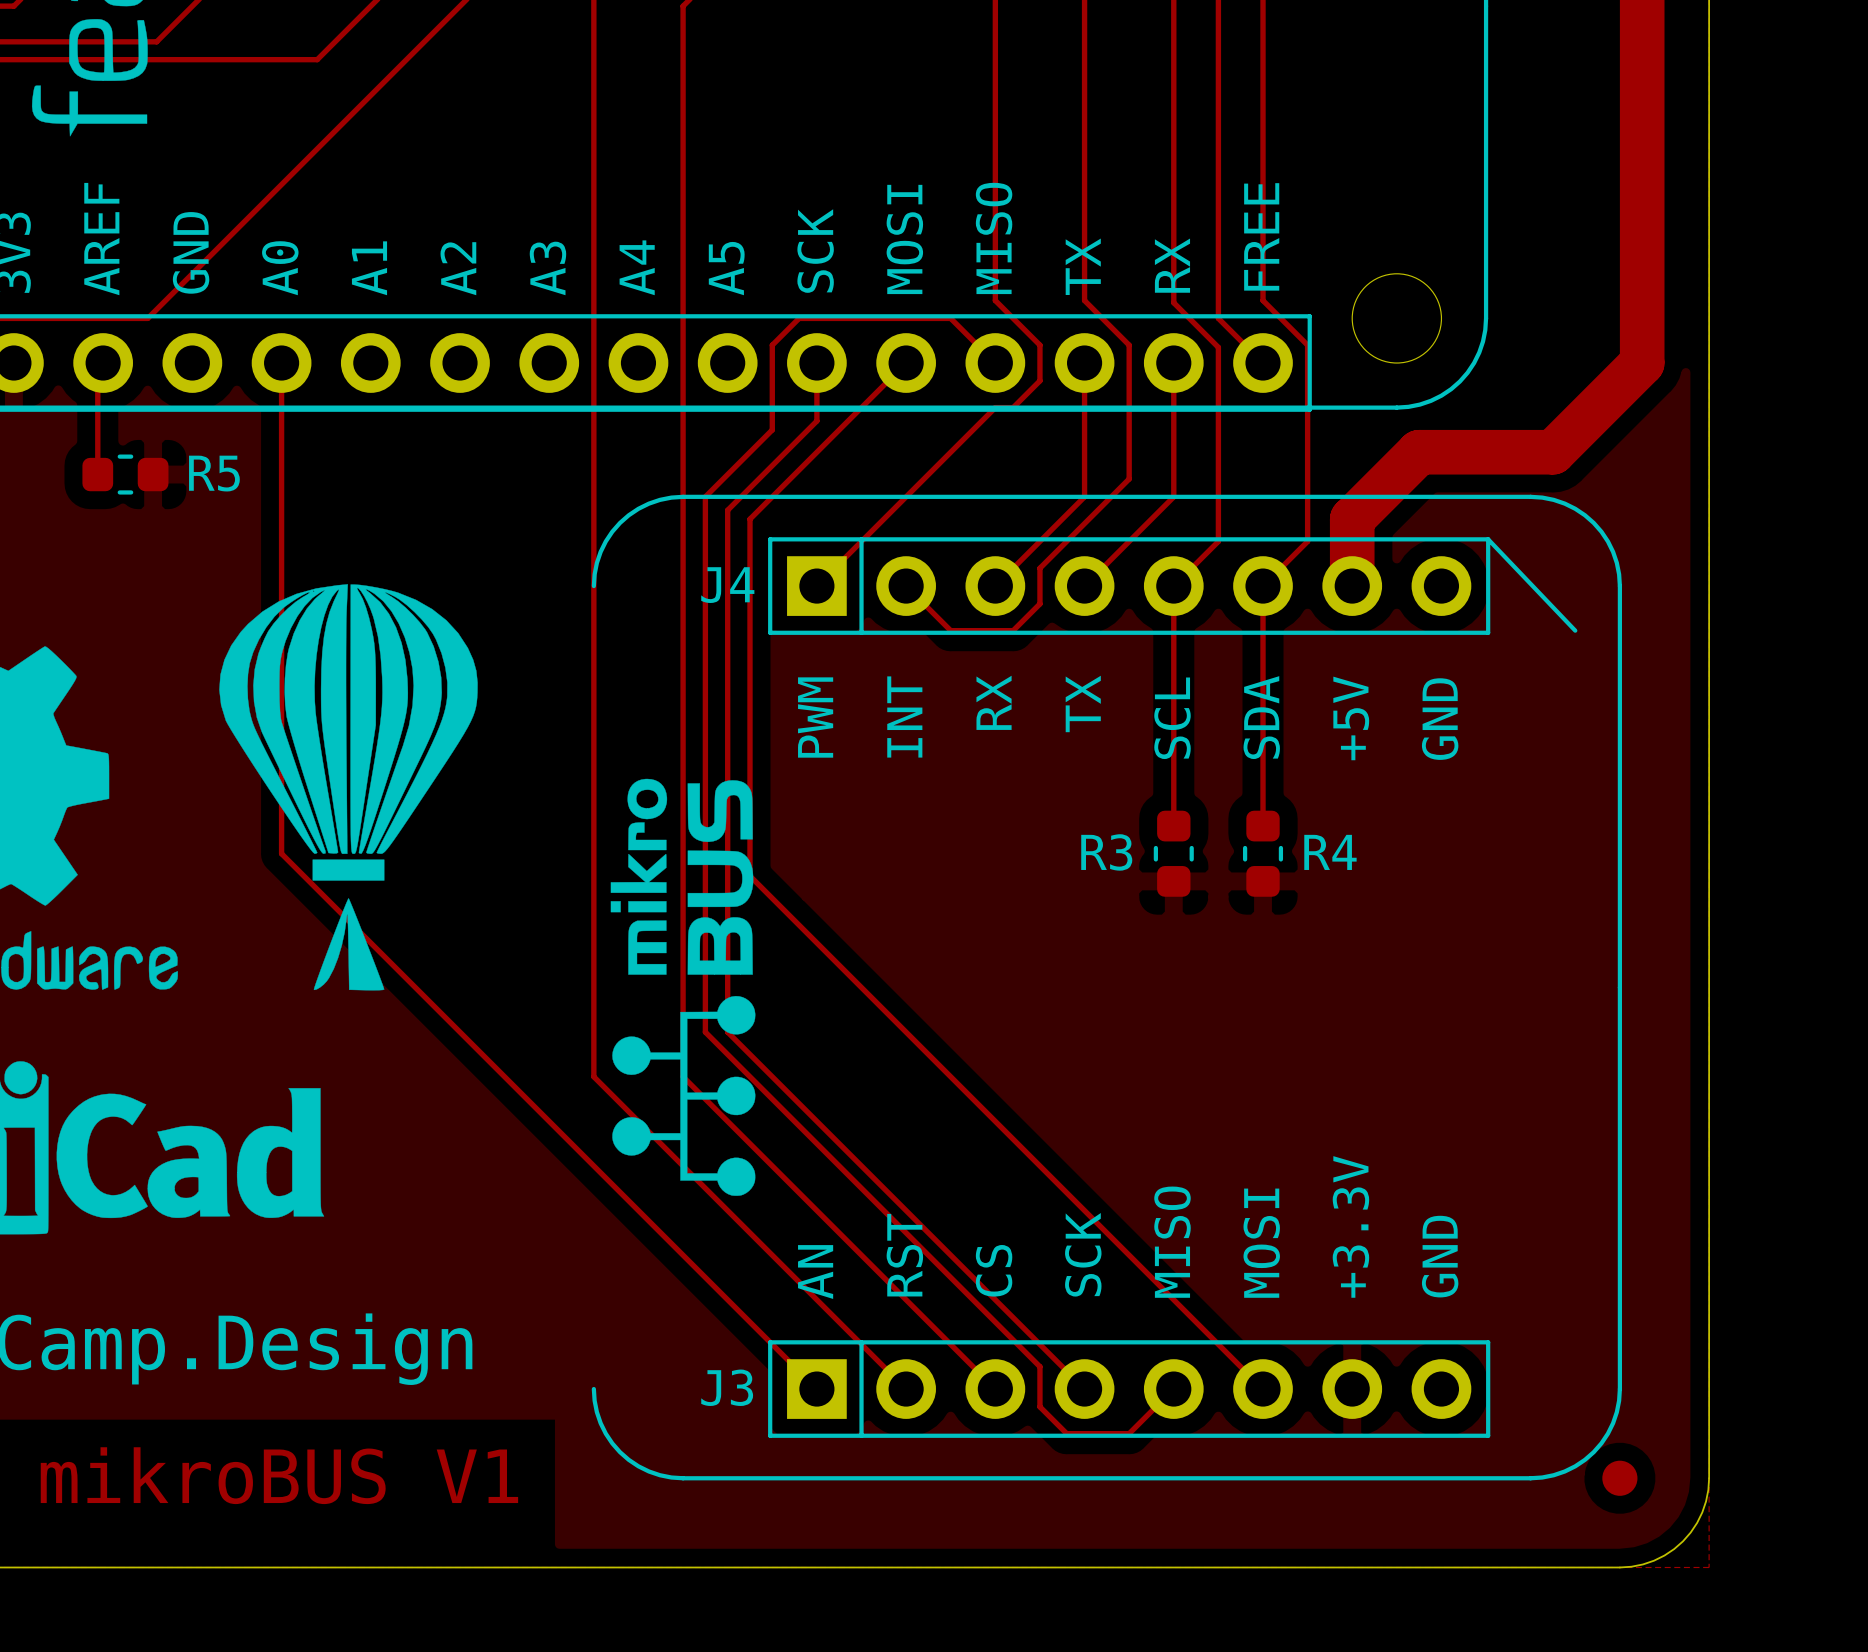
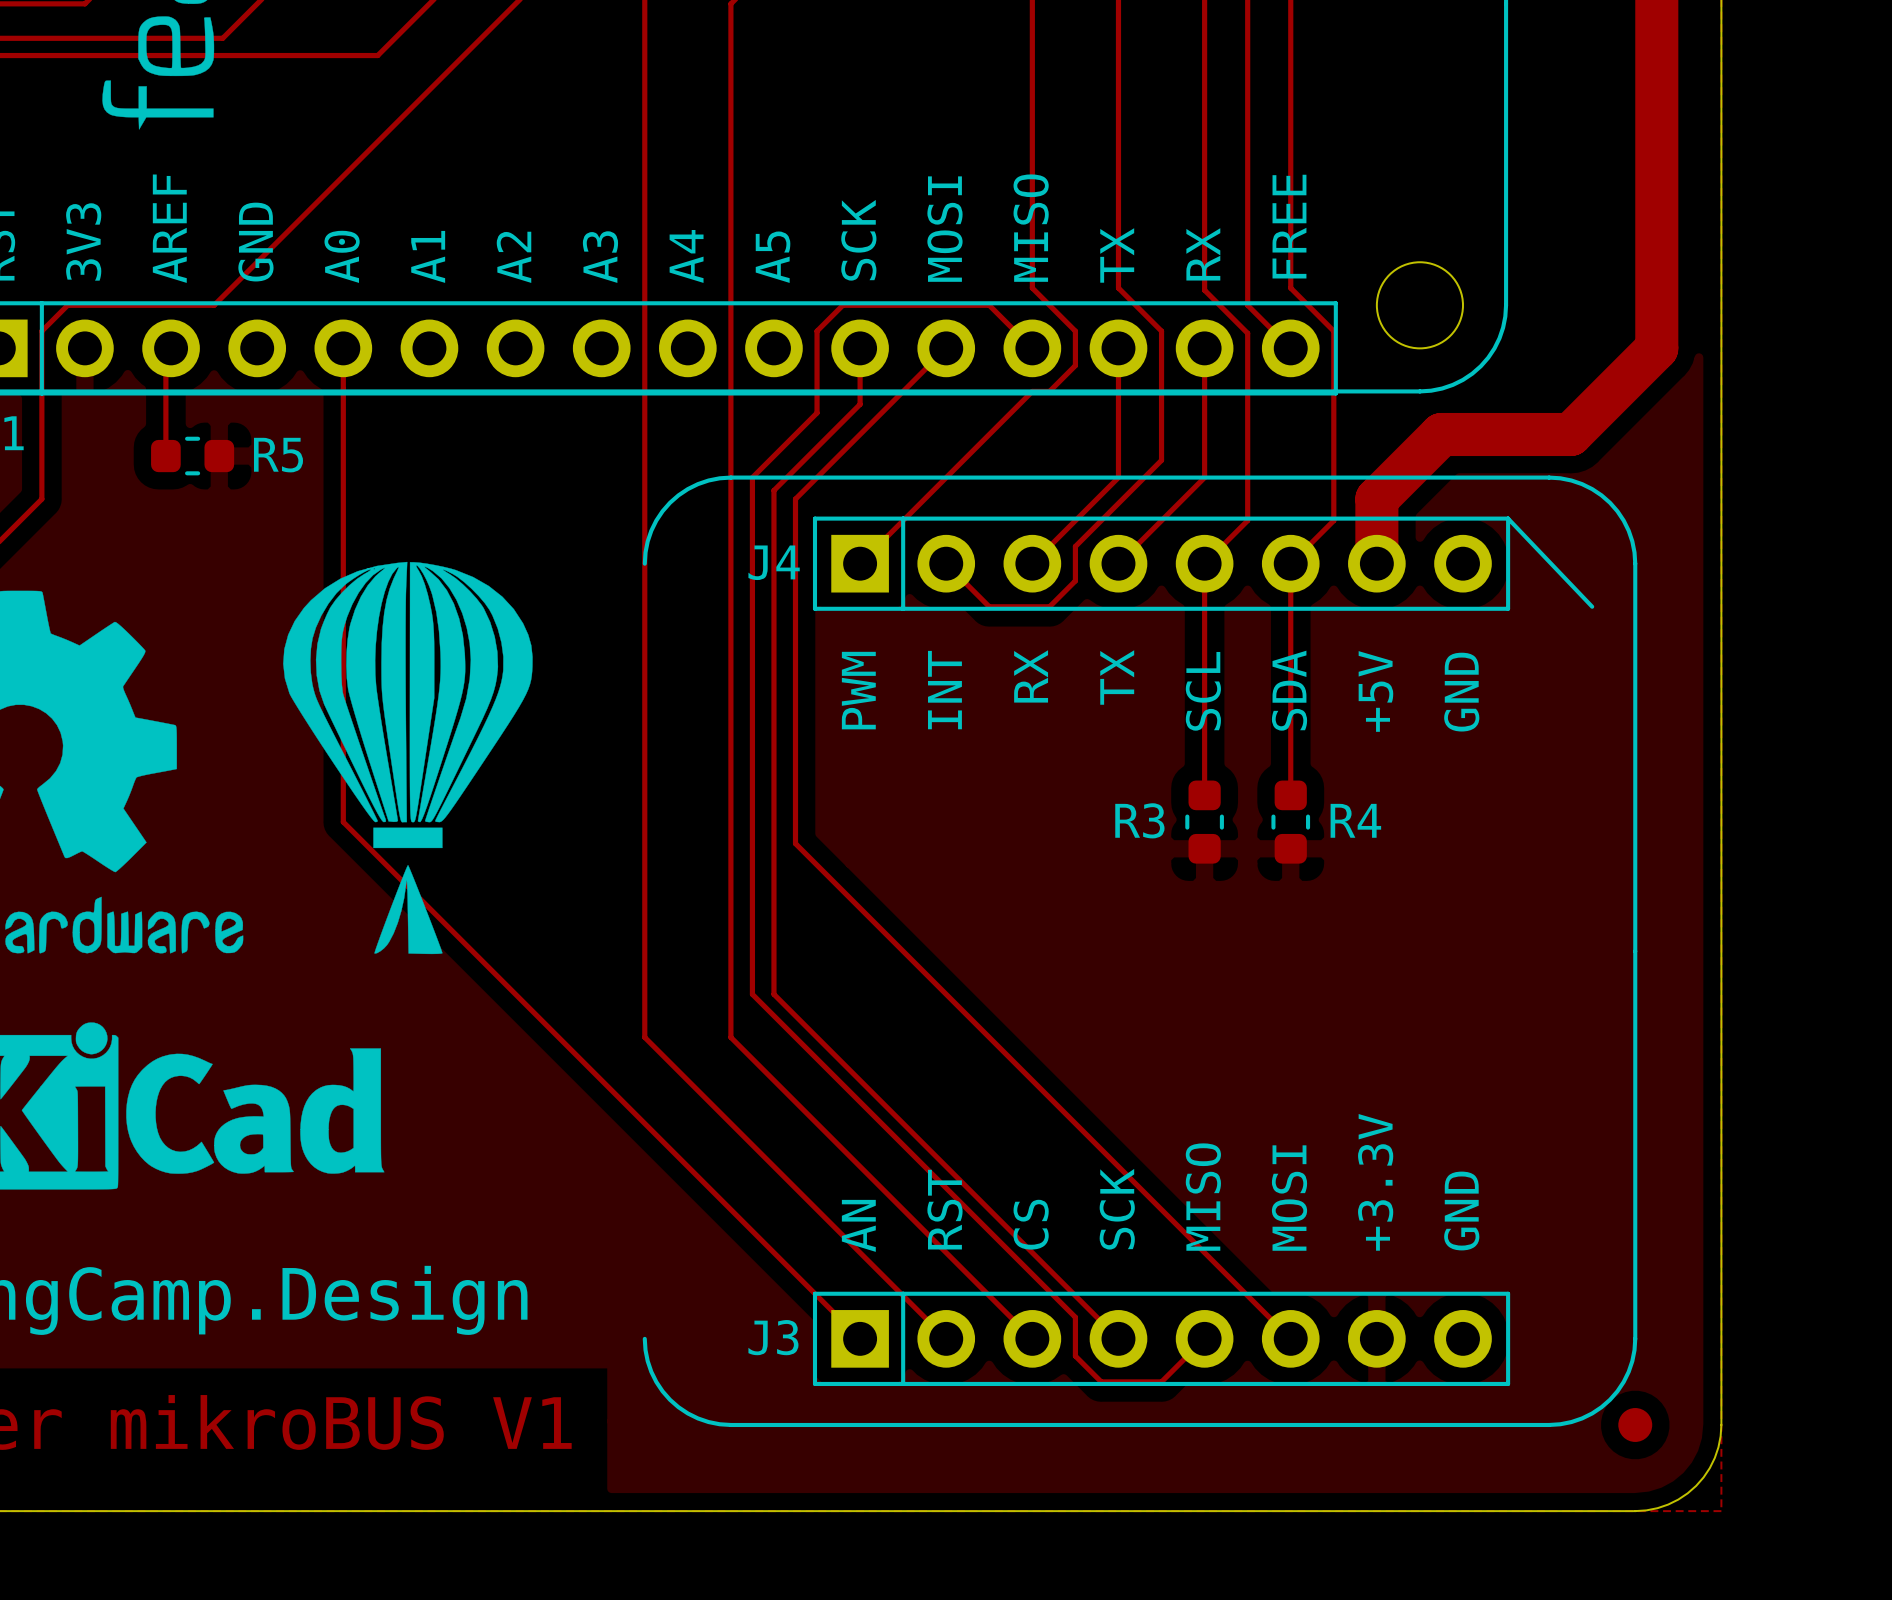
drawing: [610, 778, 756, 1196] -> none

